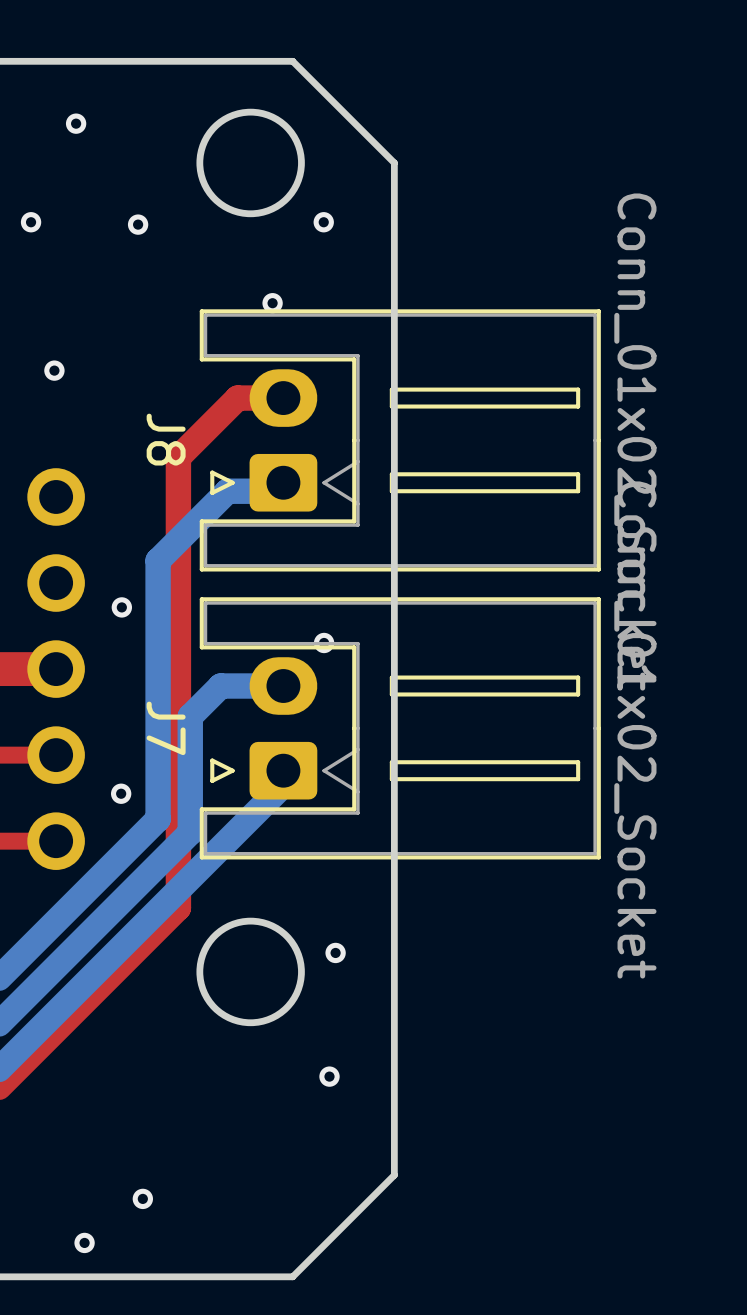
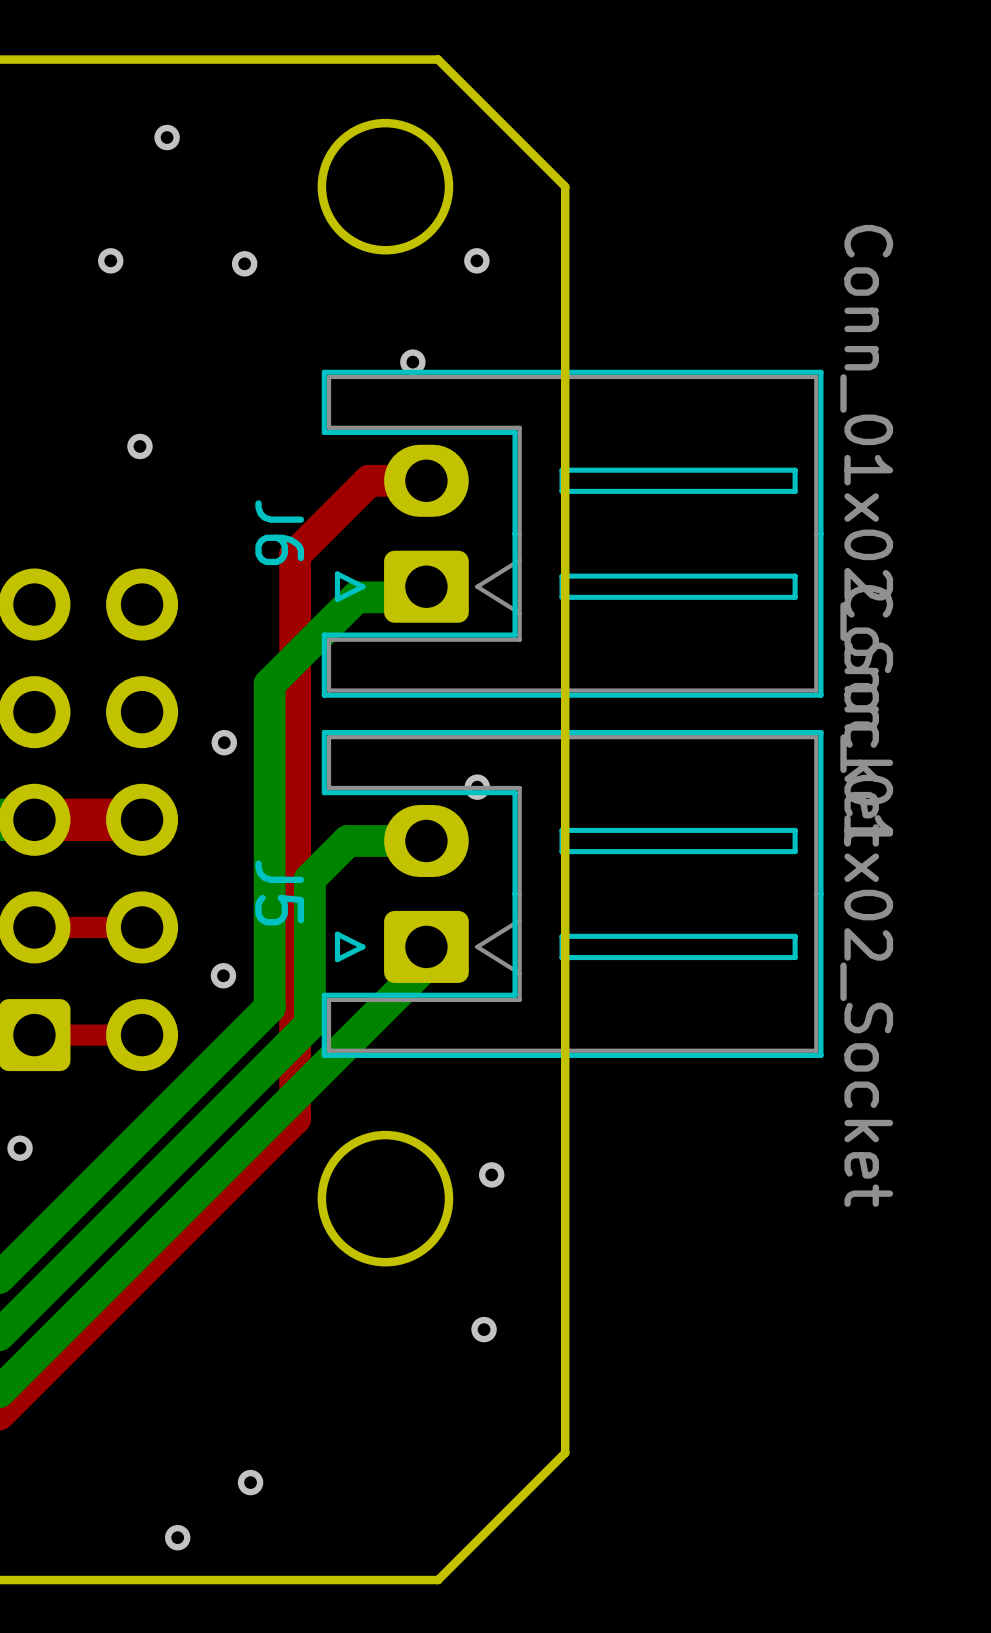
J8 name: J8 (166, 439) -> J6 (279, 532)
J7 name: J7 (166, 728) -> J5 (279, 892)

